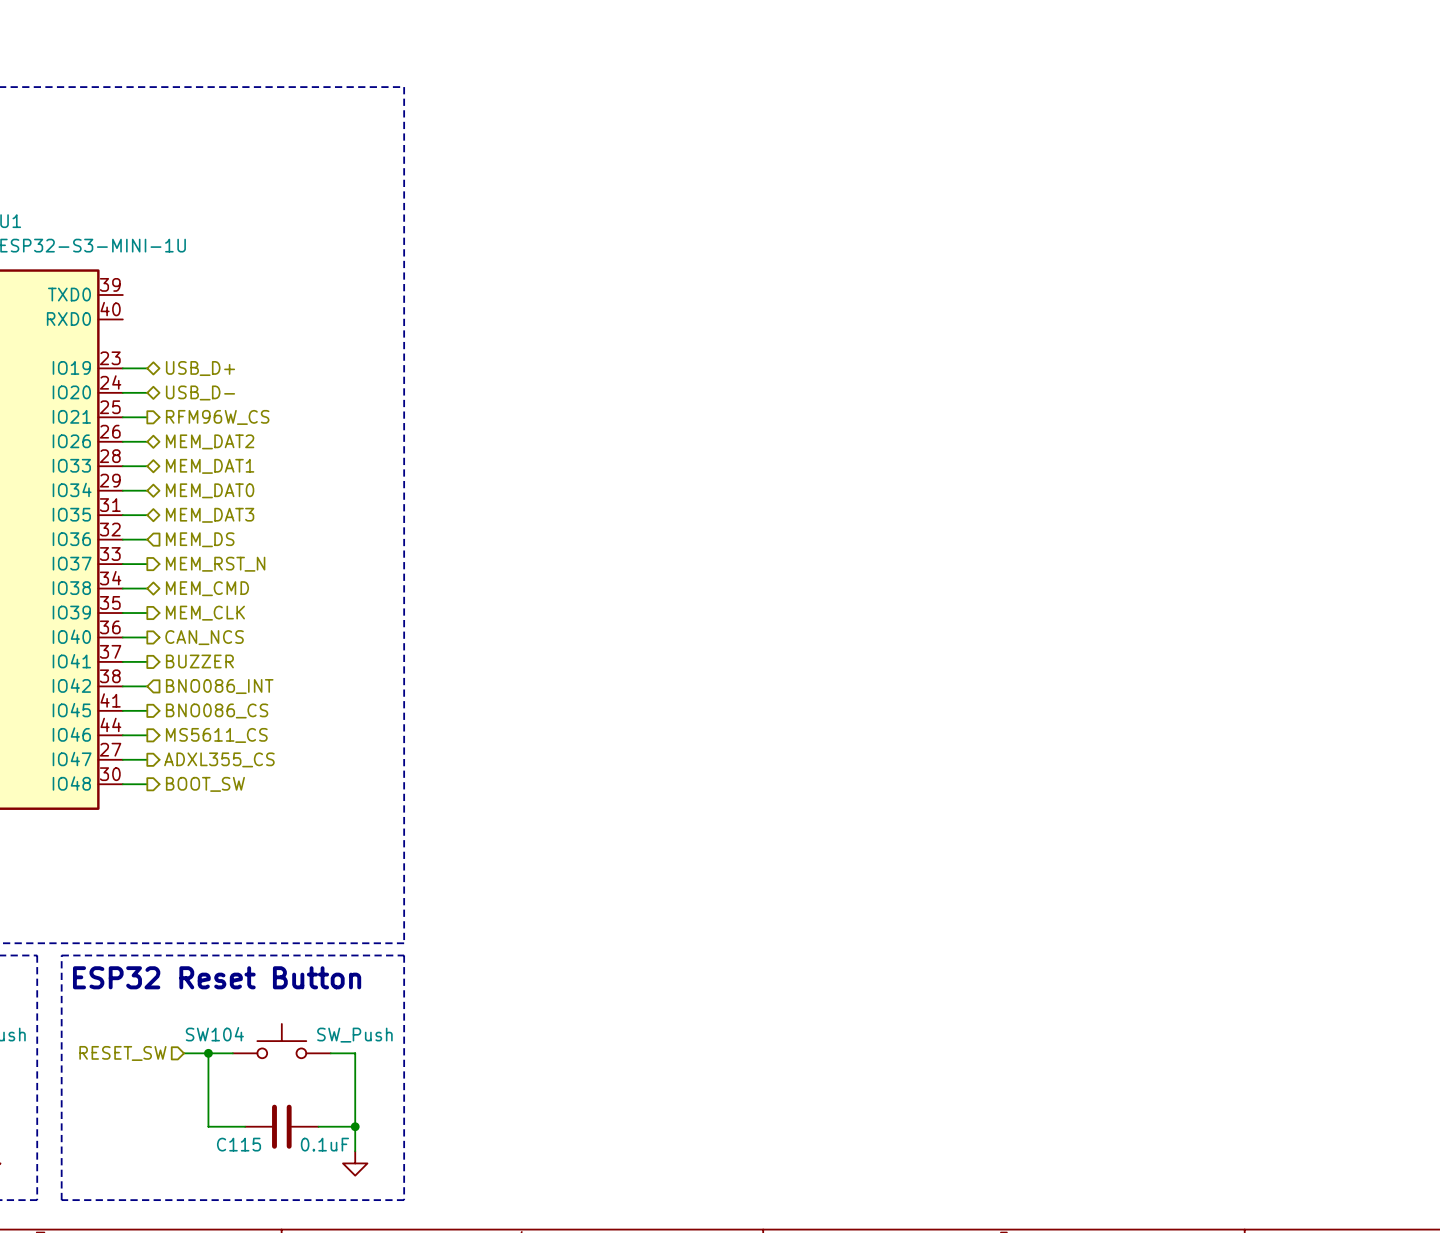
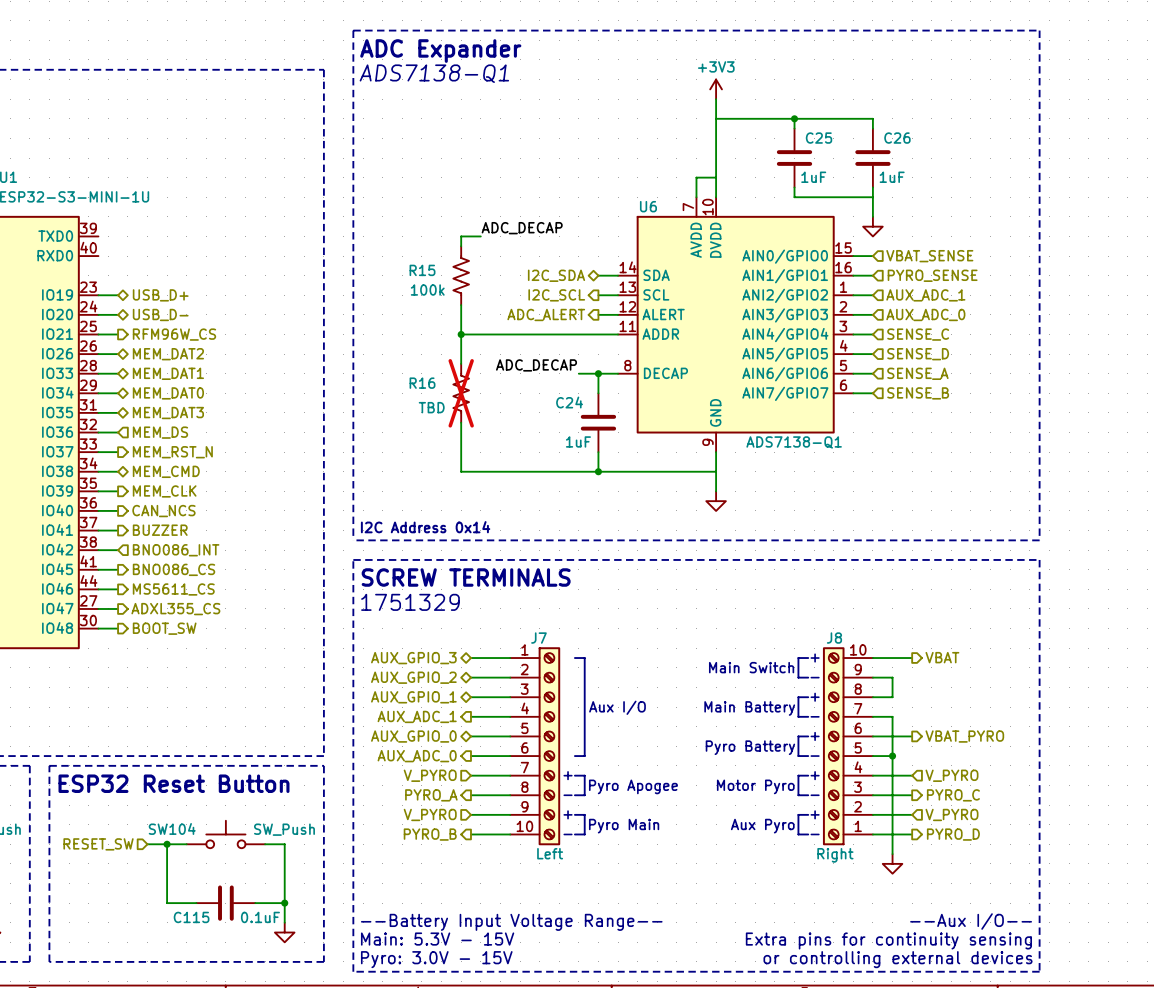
line: none -> (353, 30) (353, 540) (1039, 540) (1039, 30) (353, 30)
text: none -> ADC Expander (440, 51)
text: none -> ADS7138-Q1 (434, 73)
power symbol: none -> +3V3 (716, 89)
wire: none -> (716, 99) (716, 197)
wire: none -> (716, 118) (872, 118) (872, 128)
wire: none -> (794, 118) (794, 128)
junction: none -> (794, 118)
C25: none -> 1uF (794, 158)
C26: none -> 1uF (872, 158)
wire: none -> (716, 177) (696, 177) (696, 197)
wire: none -> (794, 187) (794, 197) (872, 197)
wire: none -> (872, 187) (872, 216)
power symbol: none -> (872, 226)
label: none -> ADC_DECAP (522, 228)
wire: none -> (480, 236) (461, 236) (461, 246)
wire: none -> (853, 256) (872, 256)
hierarchical label: none -> VBAT_SENSE (929, 256)
R15: none -> 100k (461, 275)
wire: none -> (598, 275) (618, 275)
wire: none -> (853, 275) (872, 275)
hierarchical label: none -> I2C_SDA (556, 275)
hierarchical label: none -> PYRO_SENSE (932, 275)
hierarchical label: none -> I2C_SCL (556, 295)
wire: none -> (598, 295) (618, 295)
wire: none -> (853, 295) (872, 295)
hierarchical label: none -> AUX_ADC_1 (925, 295)
wire: none -> (461, 305) (461, 363)
hierarchical label: none -> ADC_ALERT (546, 314)
wire: none -> (598, 314) (618, 314)
wire: none -> (853, 314) (872, 314)
hierarchical label: none -> AUX_ADC_0 (925, 314)
U6: none -> ADS7138-Q1 (735, 324)
wire: none -> (461, 334) (618, 334)
junction: none -> (461, 334)
wire: none -> (853, 334) (872, 334)
hierarchical label: none -> SENSE_C (918, 334)
wire: none -> (853, 354) (872, 354)
hierarchical label: none -> SENSE_D (918, 354)
label: none -> ADC_DECAP (536, 365)
wire: none -> (578, 373) (618, 373)
wire: none -> (598, 373) (598, 393)
junction: none -> (598, 373)
wire: none -> (853, 373) (872, 373)
hierarchical label: none -> SENSE_A (917, 373)
R16: none -> TBD (461, 393)
wire: none -> (853, 393) (872, 393)
hierarchical label: none -> SENSE_B (918, 393)
wire: none -> (461, 422) (461, 471) (716, 471)
C24: none -> 1uF (598, 422)
wire: none -> (598, 452) (598, 471)
wire: none -> (716, 452) (716, 491)
junction: none -> (598, 471)
power symbol: none -> (716, 501)
text: none -> I2C Address 0x14 (425, 527)
line: none -> (353, 559) (1039, 559) (1039, 971) (353, 971) (353, 559)
text: none -> SCREW TERMINALS (466, 577)
text: none -> 1751329 (410, 602)
wire: none -> (470, 658) (510, 658)
line: none -> (574, 658) (584, 658) (584, 756) (574, 756)
line: none -> (808, 658) (798, 658) (798, 677) (808, 677)
text: none -> + (815, 658)
wire: none -> (872, 658) (912, 658)
hierarchical label: none -> VBAT (942, 657)
hierarchical label: none -> AUX_GPIO_3 (413, 658)
text: none -> Main Switch (751, 667)
hierarchical label: none -> AUX_GPIO_2 (413, 677)
wire: none -> (470, 677) (510, 677)
text: none -> - (815, 677)
wire: none -> (872, 677) (892, 677) (892, 697) (872, 697)
hierarchical label: none -> AUX_GPIO_1 (413, 697)
wire: none -> (470, 697) (510, 697)
line: none -> (808, 697) (798, 697) (798, 716) (808, 716)
text: none -> + (815, 697)
text: none -> Aux I/O (617, 707)
text: none -> Main Battery (749, 708)
hierarchical label: none -> AUX_ADC_1 (417, 716)
wire: none -> (470, 716) (510, 716)
text: none -> - (815, 716)
wire: none -> (872, 716) (892, 716) (892, 854)
hierarchical label: none -> AUX_GPIO_0 (413, 736)
wire: none -> (470, 736) (510, 736)
line: none -> (808, 736) (798, 736) (798, 756) (808, 756)
text: none -> + (815, 736)
wire: none -> (872, 736) (912, 736)
hierarchical label: none -> VBAT_PYRO (964, 736)
J7: none -> Left (535, 746)
J8: none -> Right (847, 746)
text: none -> Pyro Battery (750, 747)
hierarchical label: none -> AUX_ADC_0 (417, 756)
wire: none -> (470, 756) (510, 756)
text: none -> - (815, 756)
wire: none -> (872, 756) (892, 756)
junction: none -> (892, 756)
hierarchical label: none -> V_PYRO (430, 775)
wire: none -> (470, 775) (510, 775)
text: none -> + (568, 775)
line: none -> (574, 775) (584, 775) (584, 795) (574, 795)
line: none -> (808, 775) (798, 775) (798, 795) (808, 795)
text: none -> + (815, 775)
wire: none -> (872, 775) (912, 775)
hierarchical label: none -> V_PYRO (951, 775)
text: none -> Pyro Apogee (633, 786)
text: none -> Motor Pyro (755, 786)
hierarchical label: none -> PYRO_A (431, 795)
wire: none -> (470, 795) (510, 795)
text: none -> - (568, 795)
text: none -> - (815, 795)
wire: none -> (872, 795) (912, 795)
hierarchical label: none -> PYRO_C (953, 795)
hierarchical label: none -> V_PYRO (430, 814)
wire: none -> (470, 814) (510, 814)
text: none -> + (568, 814)
line: none -> (574, 814) (584, 814) (584, 834) (574, 834)
line: none -> (808, 814) (798, 814) (798, 834) (808, 834)
text: none -> + (815, 814)
wire: none -> (872, 814) (912, 814)
hierarchical label: none -> V_PYRO (951, 814)
text: none -> Pyro Main (624, 826)
text: none -> Aux Pyro (762, 826)
hierarchical label: none -> PYRO_B (430, 834)
wire: none -> (470, 834) (510, 834)
text: none -> - (568, 834)
text: none -> - (815, 834)
wire: none -> (872, 834) (912, 834)
hierarchical label: none -> PYRO_D (953, 834)
power symbol: none -> (892, 863)
text: none -> --Aux I/O-- (971, 921)
text: none -> --Battery Input Voltage Range-- (511, 922)
text: none -> Main: 5.3V - 15V (437, 939)
text: none -> Extra pins for continuity sensing (888, 940)
text: none -> Pyro: 3.0V - 15V (436, 959)
text: none -> or controlling external devices (898, 959)

